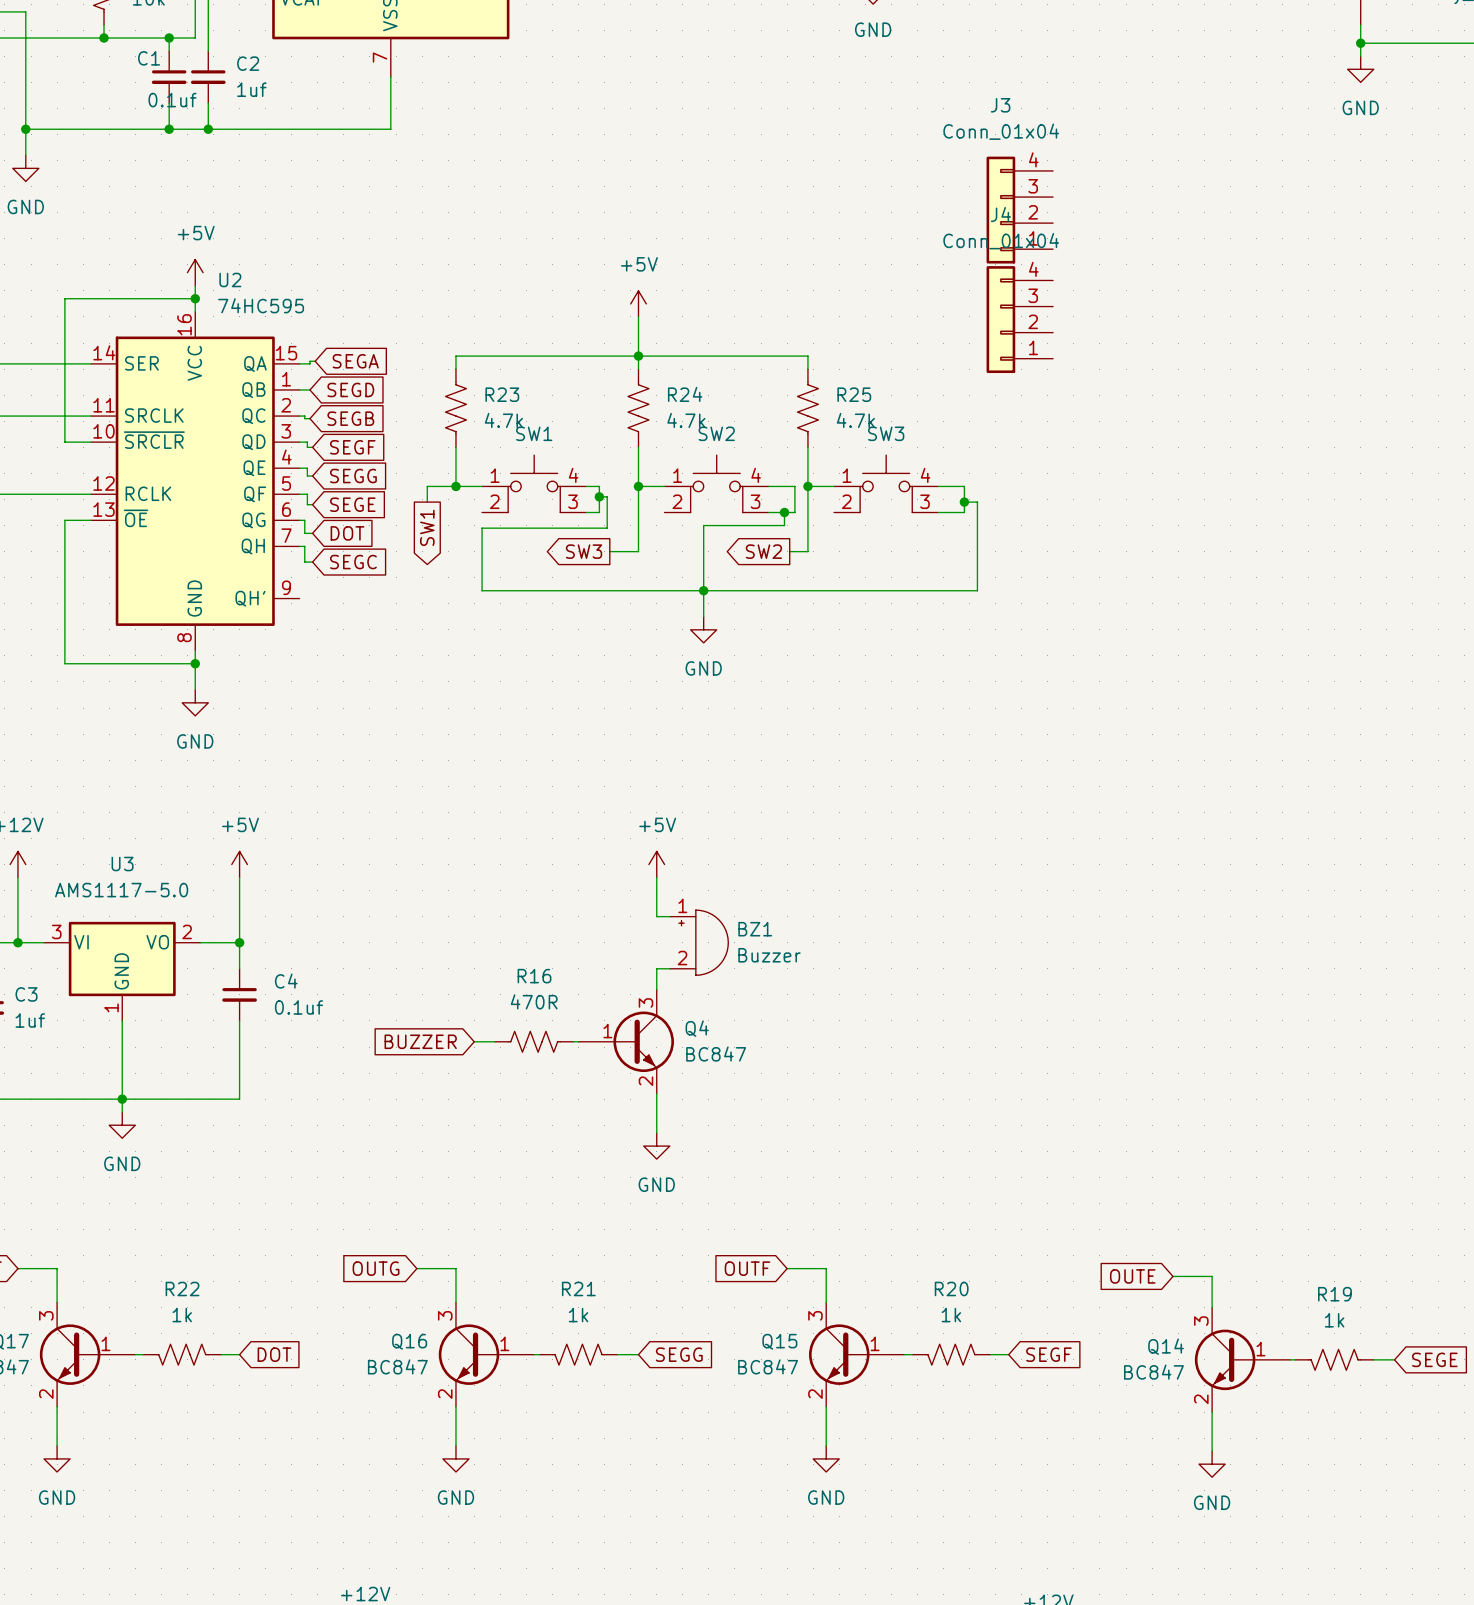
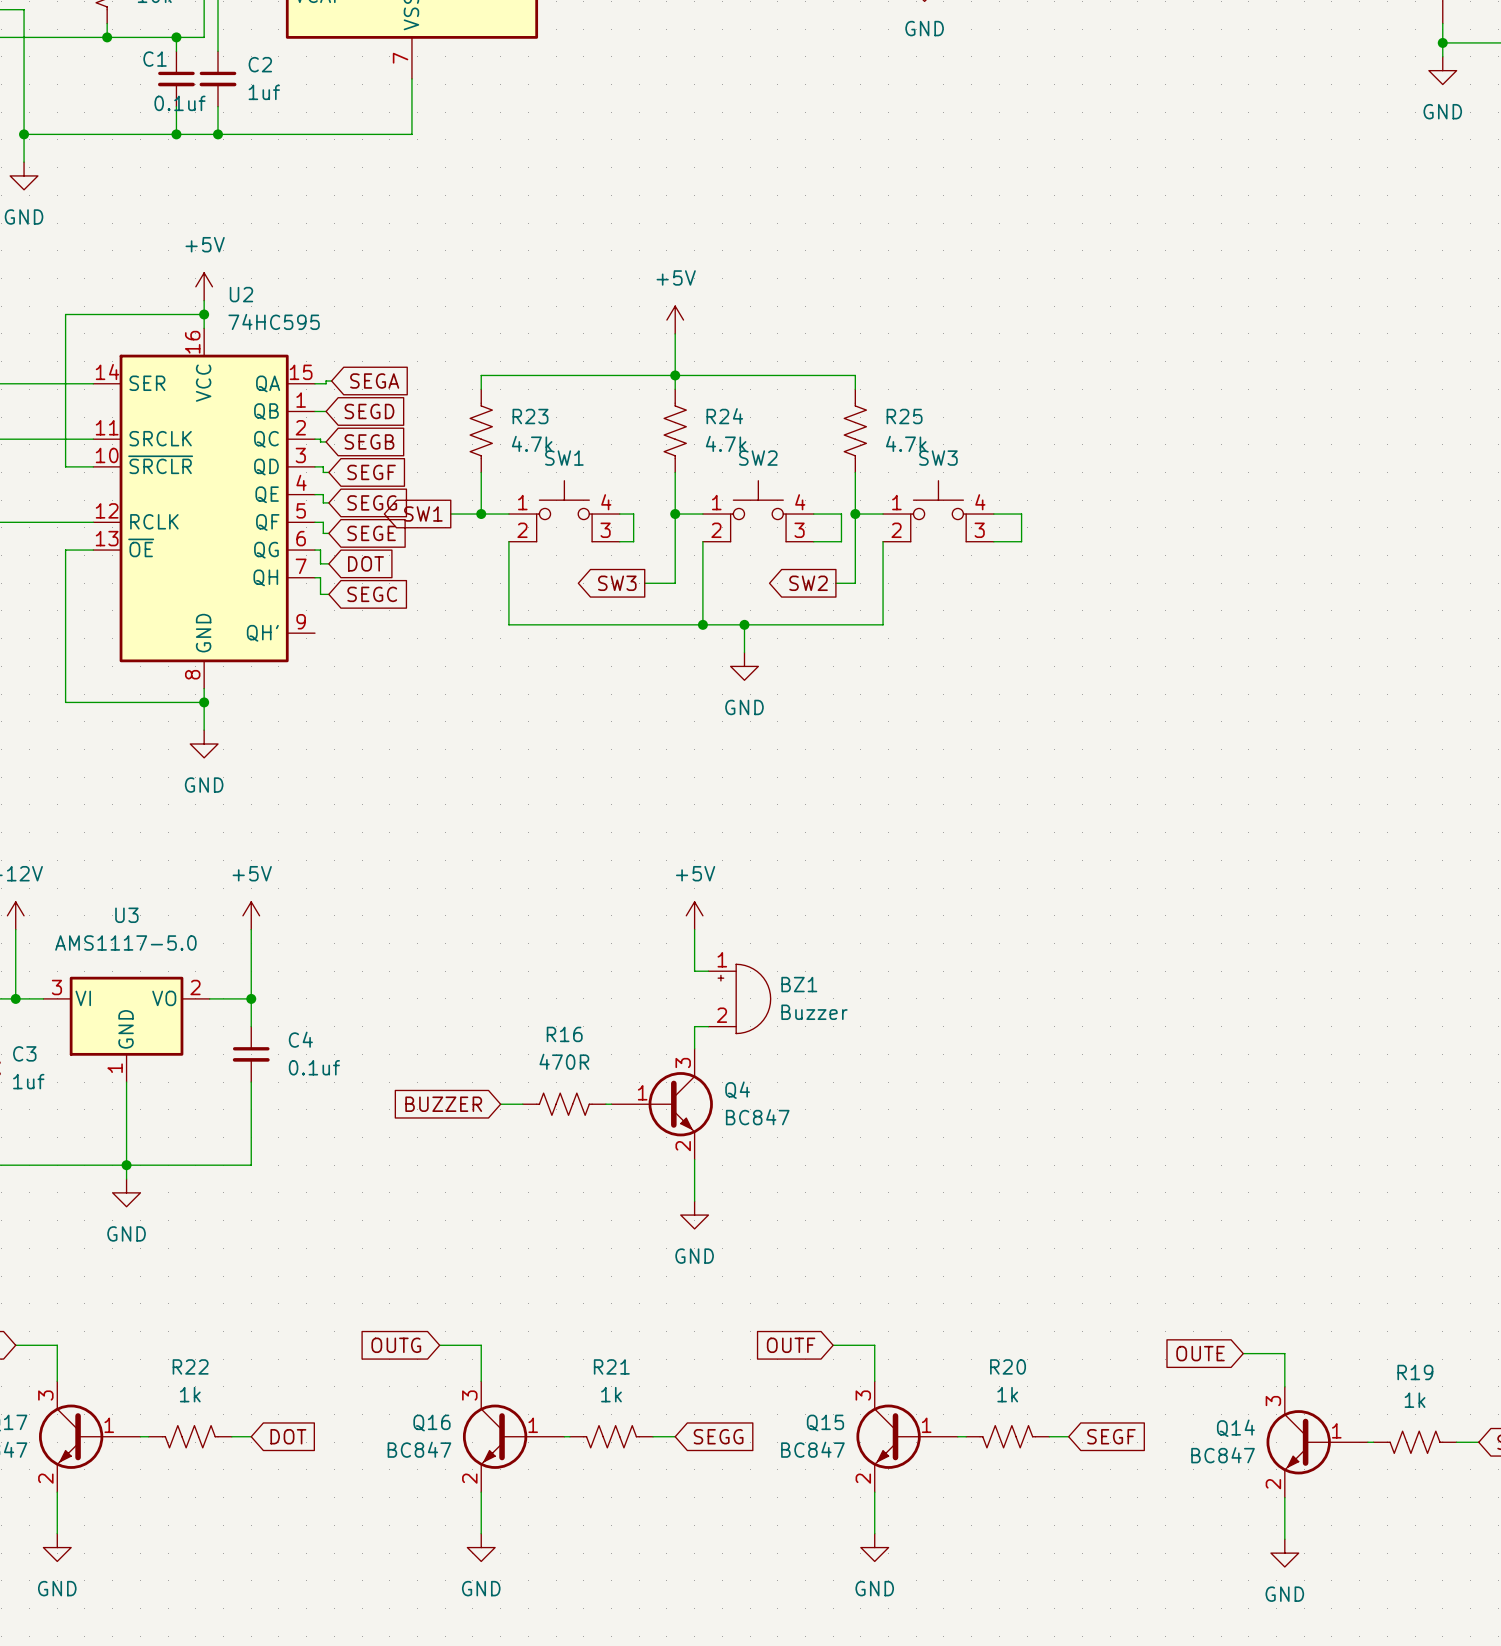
J3: Conn_01x04 (1019, 210) -> none
J4: Conn_01x04 (1019, 319) -> none
wire: (599, 496) (607, 496) (607, 528) (482, 528) -> (508, 541) (508, 558)
junction: (599, 496) -> none
wire: (964, 502) (977, 502) (977, 590) (834, 590) -> (883, 541) (883, 624)
junction: (964, 502) -> none
wire: none -> (702, 541) (702, 624)
wire: (784, 512) (784, 525) (703, 525) (703, 590) -> none
junction: (784, 512) -> none
global label rotation: 0° (427, 527) -> 90° clockwise (423, 514)
junction: none -> (702, 624)

